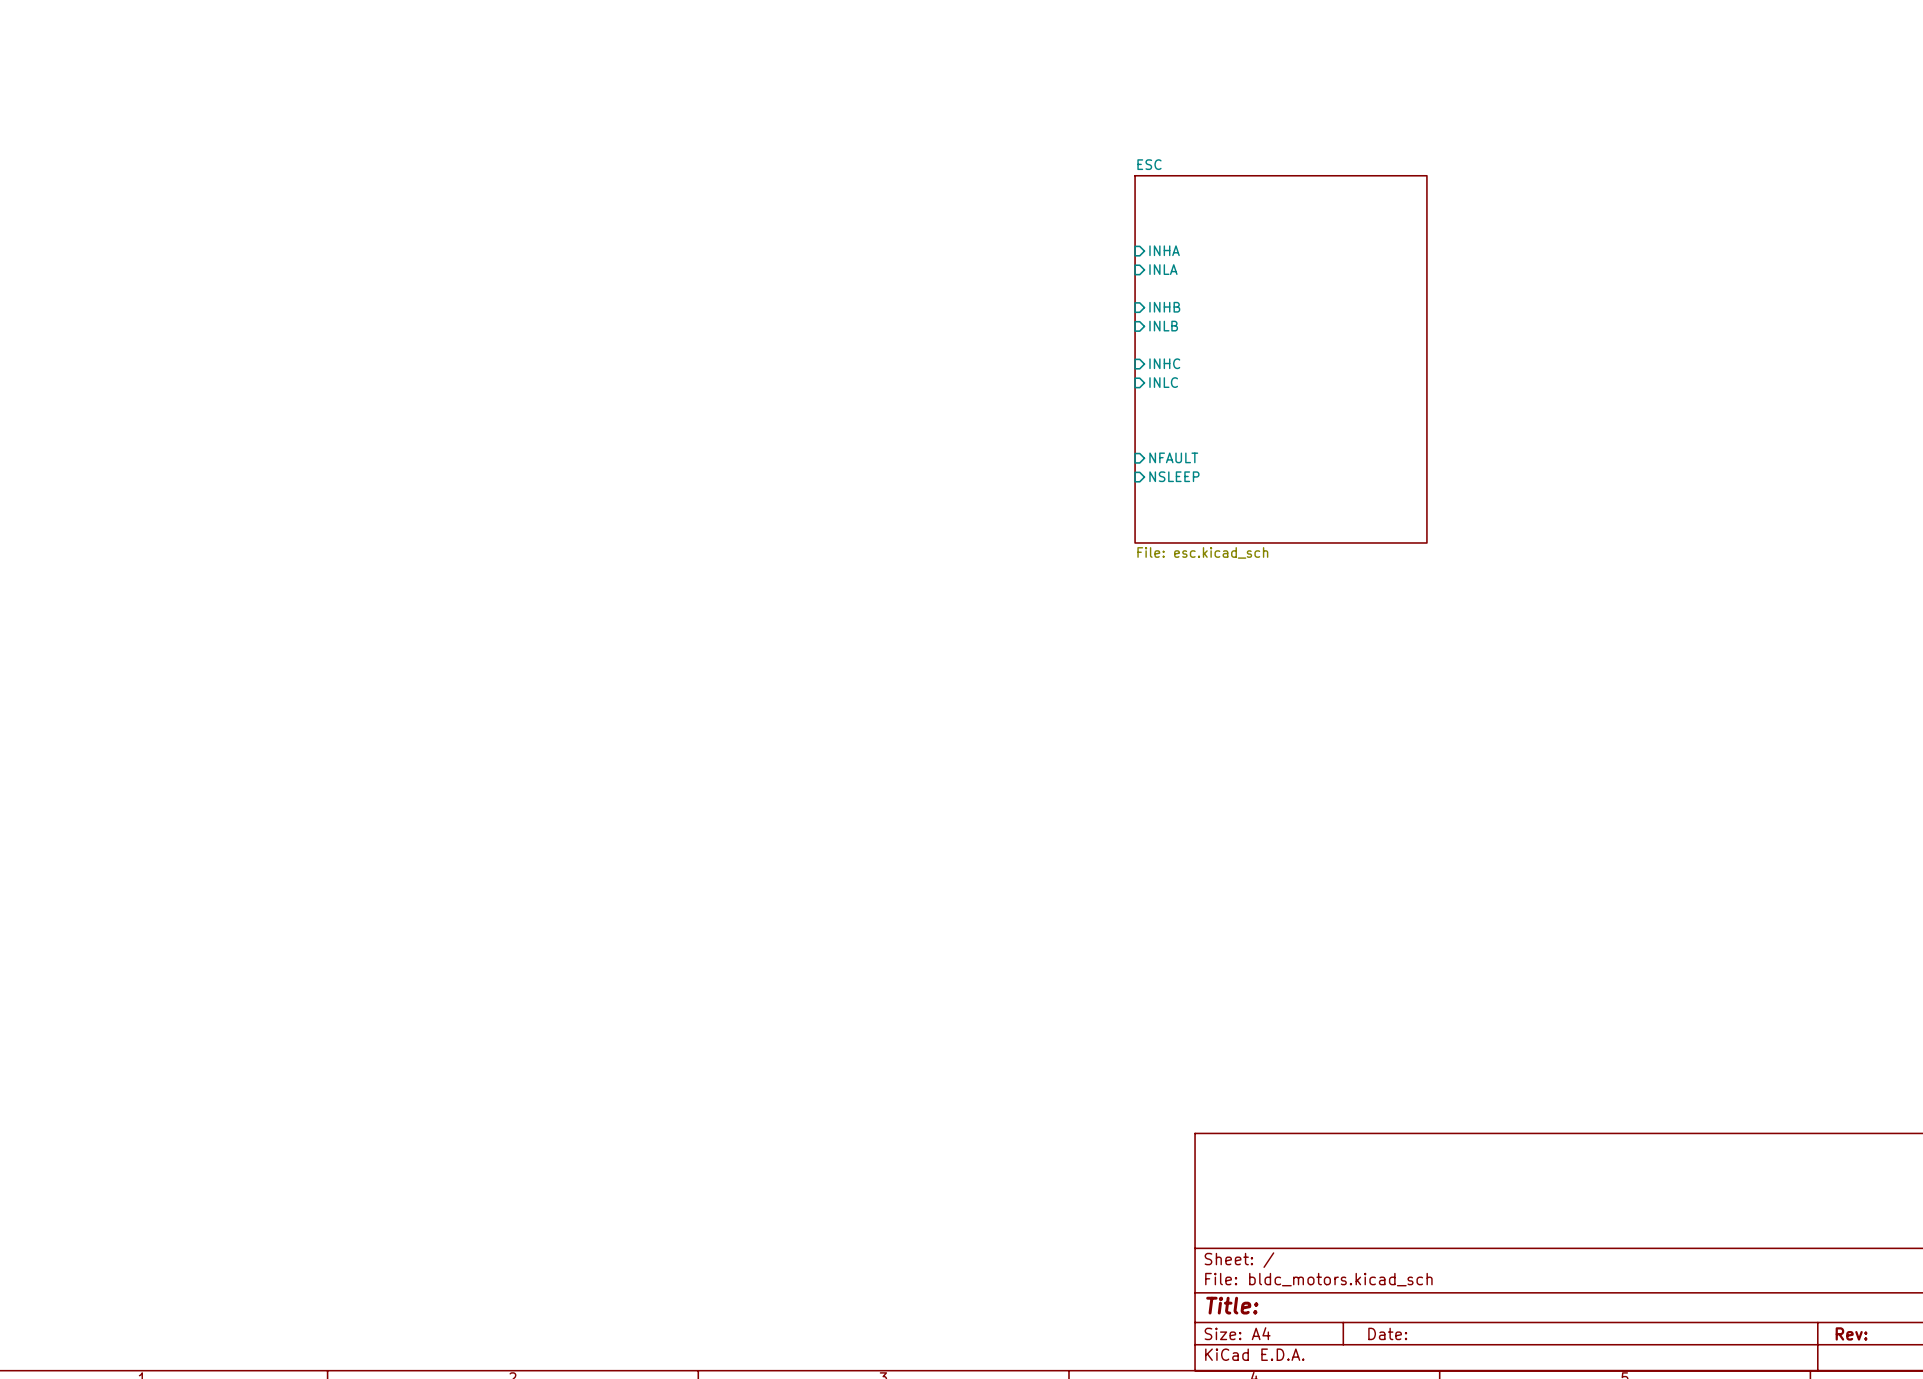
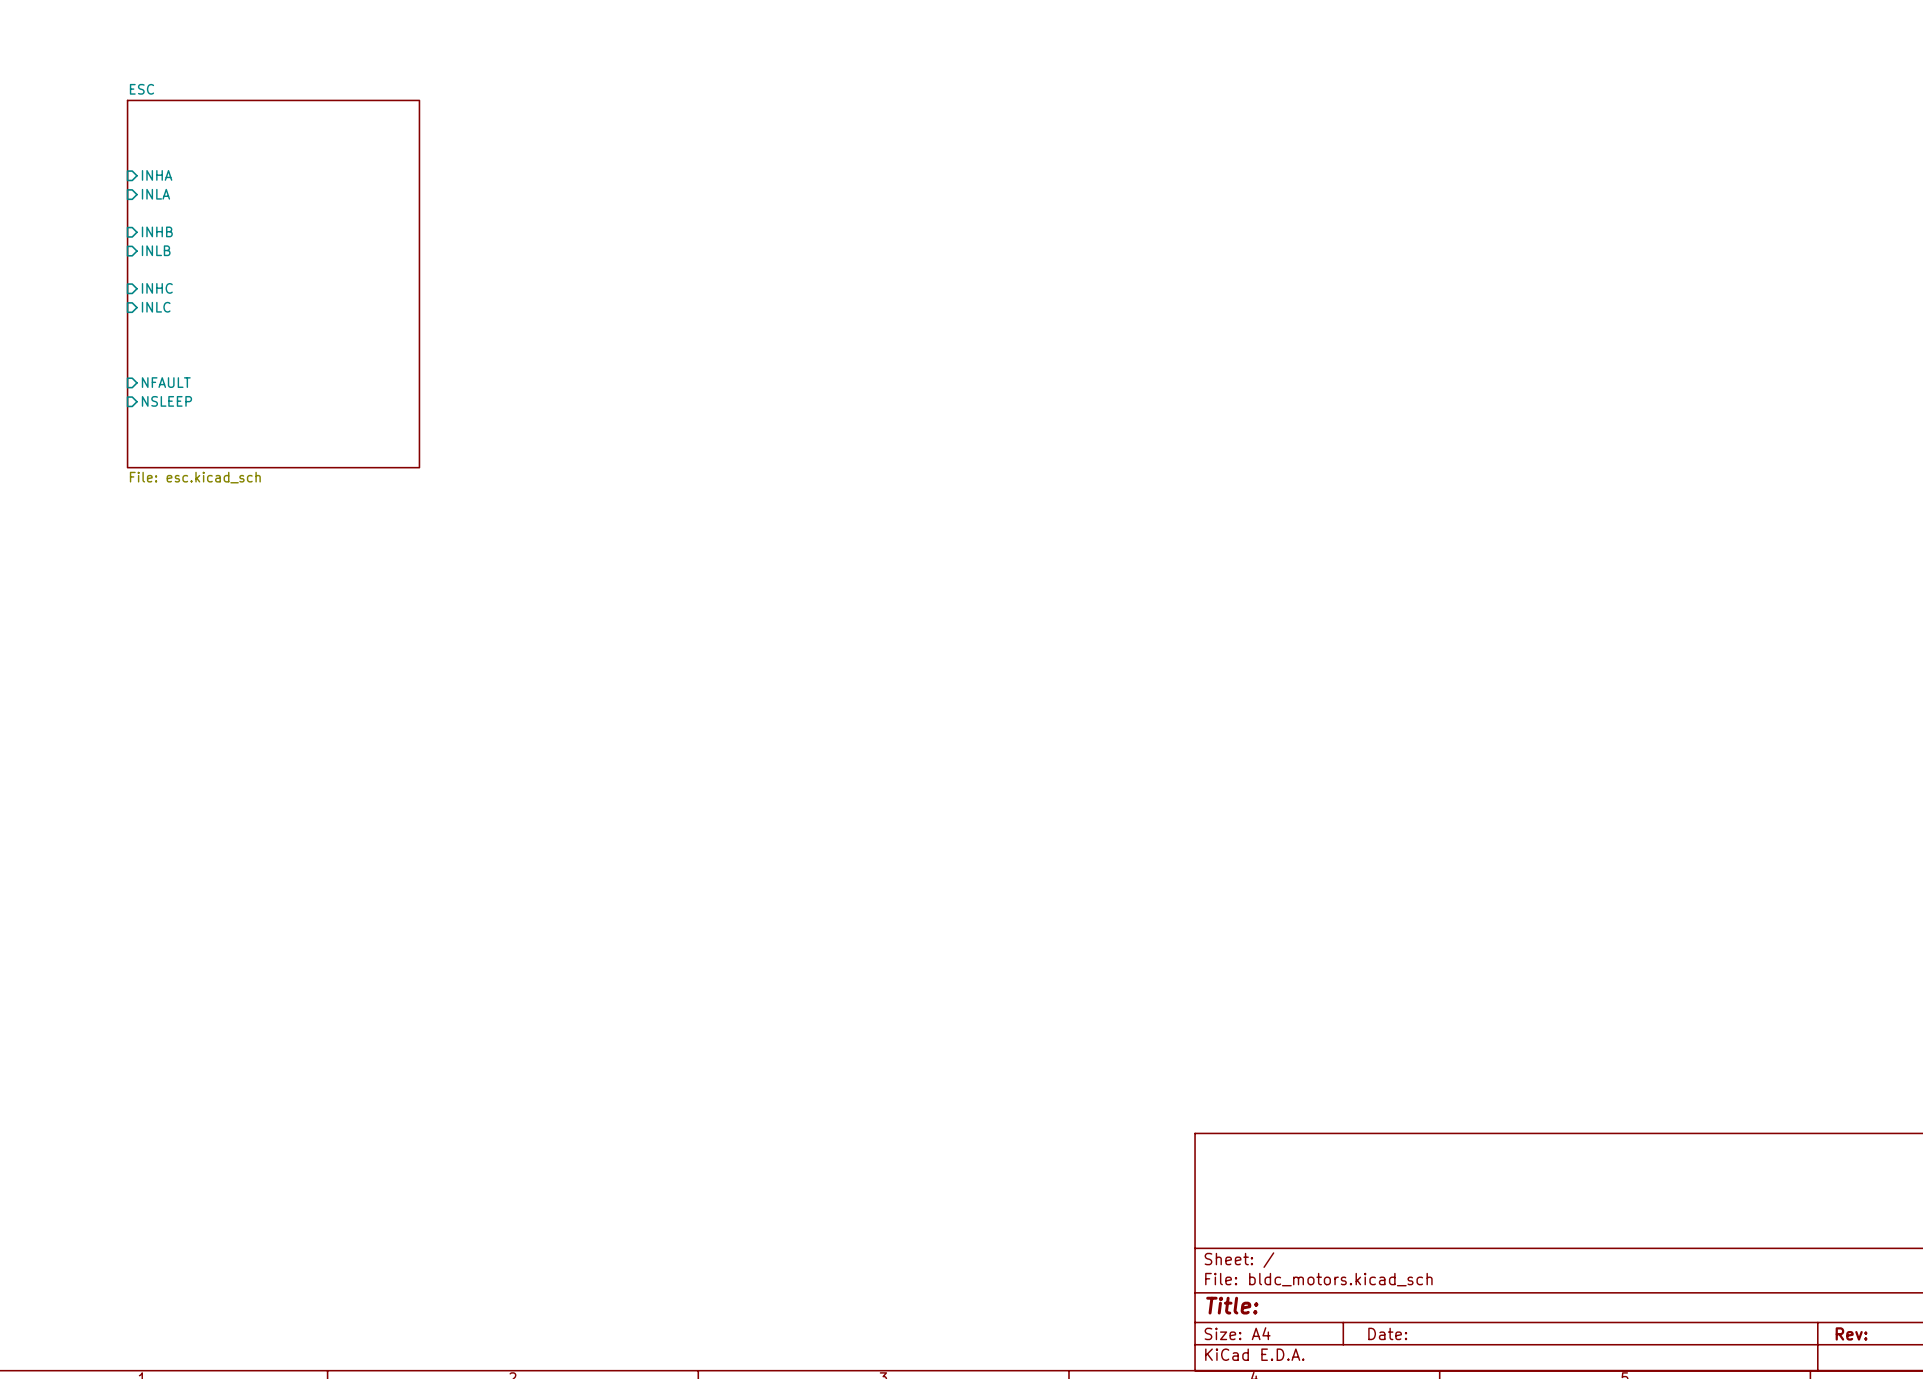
sheet pin: none -> INHA (157, 175)
sheet pin: none -> INLA (155, 194)
sheet pin: none -> INHB (157, 231)
sheet pin: none -> INLB (156, 250)
sheet pin: INHA (1164, 250) -> none
sheet pin: INLA (1163, 269) -> none
sheet ESC: none -> File: esc.kicad_sch (273, 284)
sheet pin: none -> INHC (157, 288)
sheet pin: none -> INLC (156, 307)
sheet pin: INHB (1164, 307) -> none
sheet pin: INLB (1163, 326) -> none
sheet ESC: File: esc.kicad_sch (1280, 359) -> none
sheet pin: INHC (1164, 363) -> none
sheet pin: none -> NFAULT (166, 382)
sheet pin: INLC (1163, 382) -> none
sheet pin: none -> NSLEEP (166, 401)
sheet pin: NFAULT (1173, 457) -> none
sheet pin: NSLEEP (1174, 476) -> none

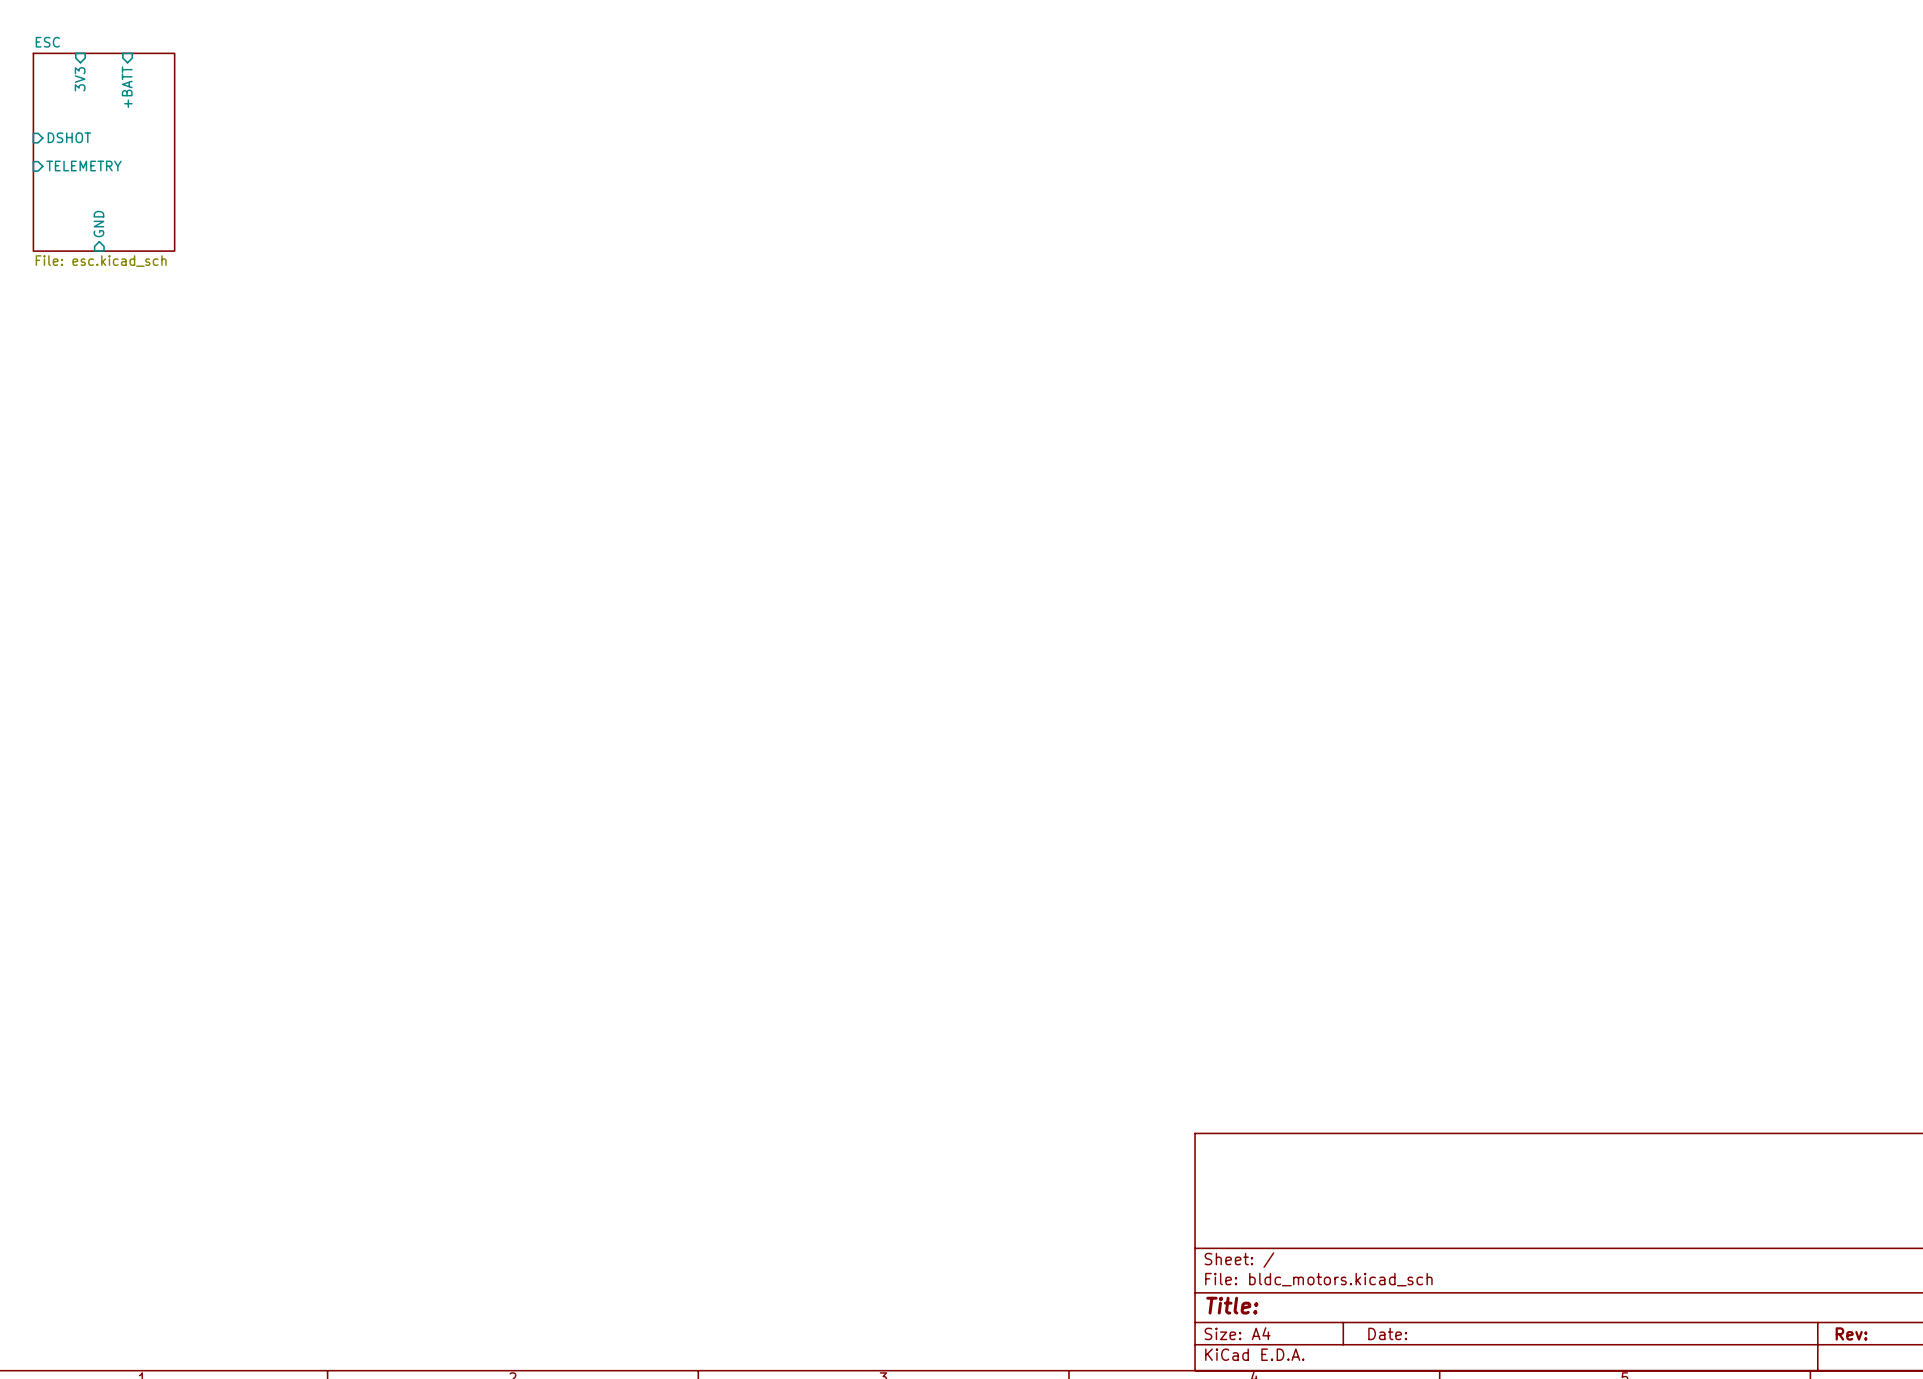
sheet pin: none -> 3V3 (80, 79)
sheet pin: none -> +BATT (127, 87)
sheet pin: none -> DSHOT (69, 137)
sheet ESC: none -> File: esc.kicad_sch (104, 152)
sheet pin: none -> TELEMETRY (83, 166)
sheet pin: INHA (157, 175) -> none
sheet pin: INLA (155, 194) -> none
sheet pin: none -> GND (98, 224)
sheet pin: INHB (157, 231) -> none
sheet pin: INLB (156, 250) -> none
sheet ESC: File: esc.kicad_sch (273, 284) -> none
sheet pin: INHC (157, 288) -> none
sheet pin: INLC (156, 307) -> none
sheet pin: NFAULT (166, 382) -> none
sheet pin: NSLEEP (166, 401) -> none

